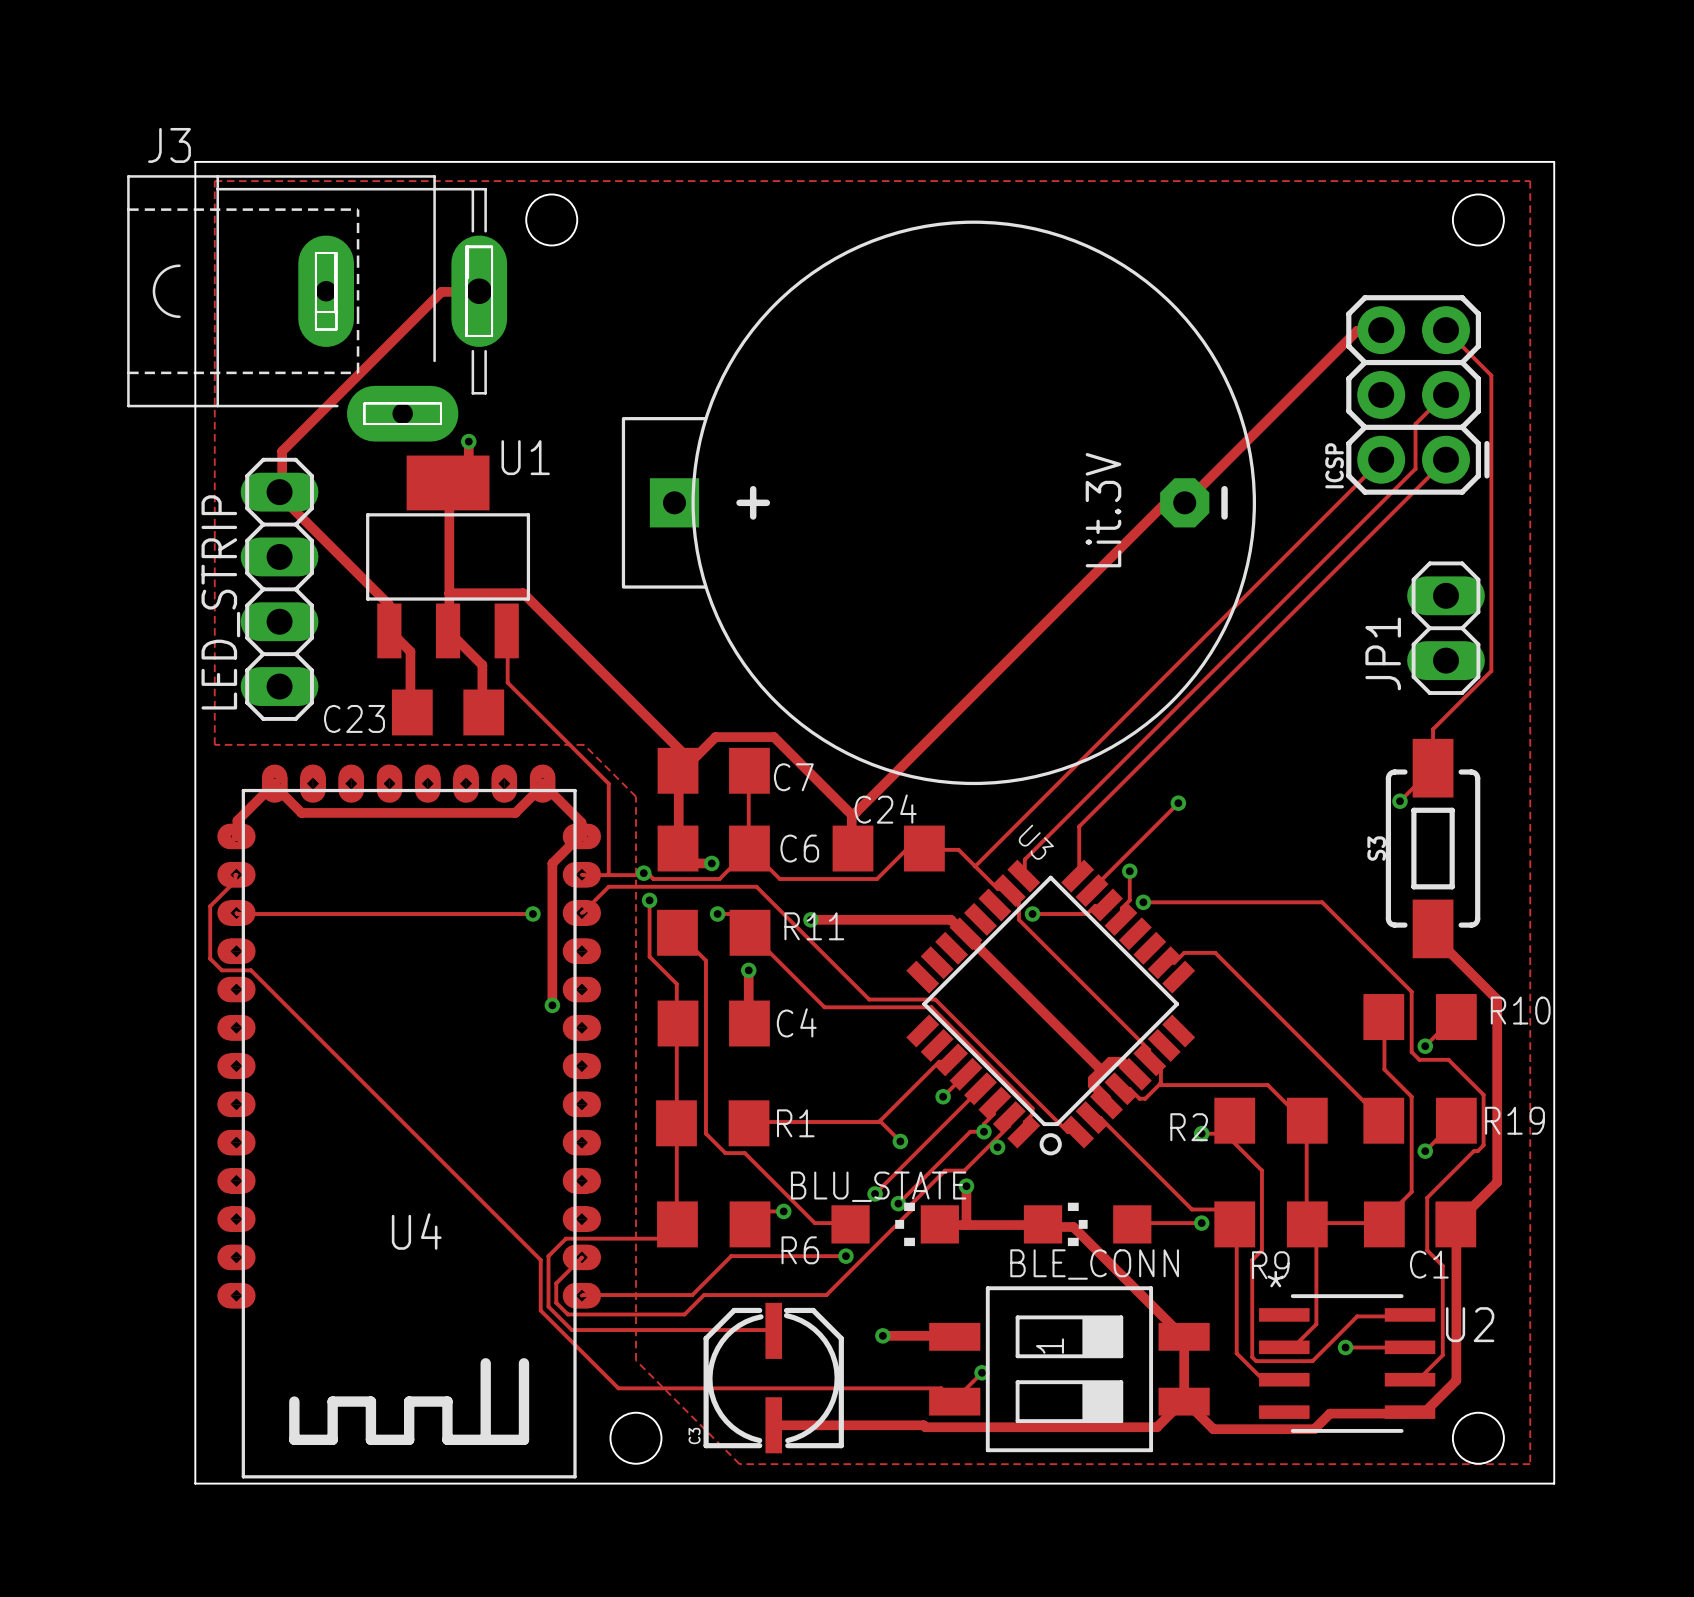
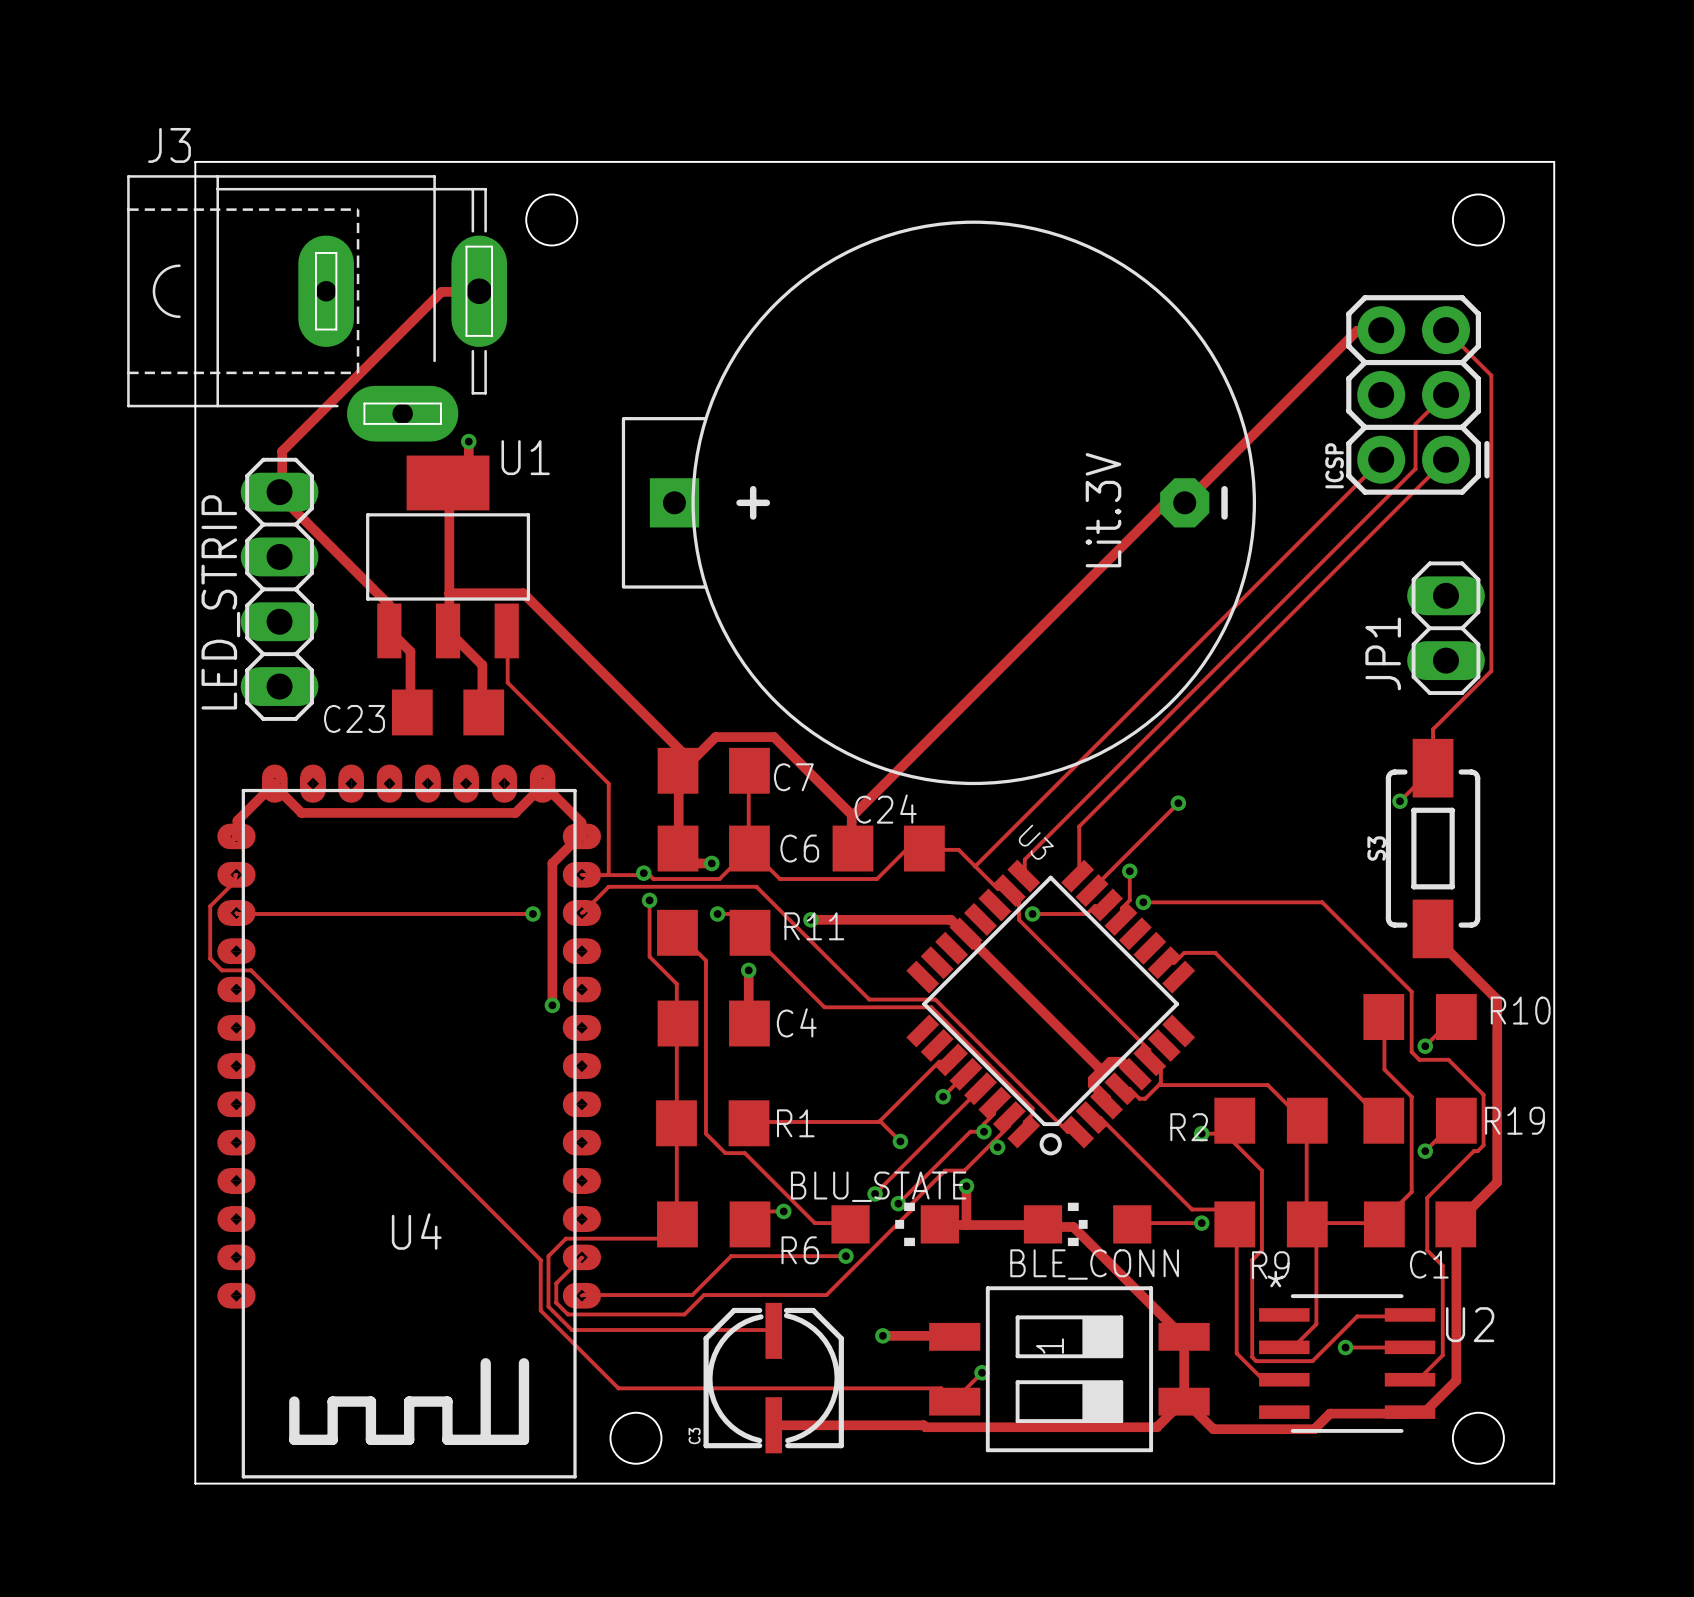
J3 footprint: [127, 175, 508, 442] -> [127, 175, 508, 442]
zone outline: (214, 181) (1530, 181) (1530, 1464) (739, 1464) (635, 1360) (635, 796) (584, 744) (214, 744) (214, 181) -> none

